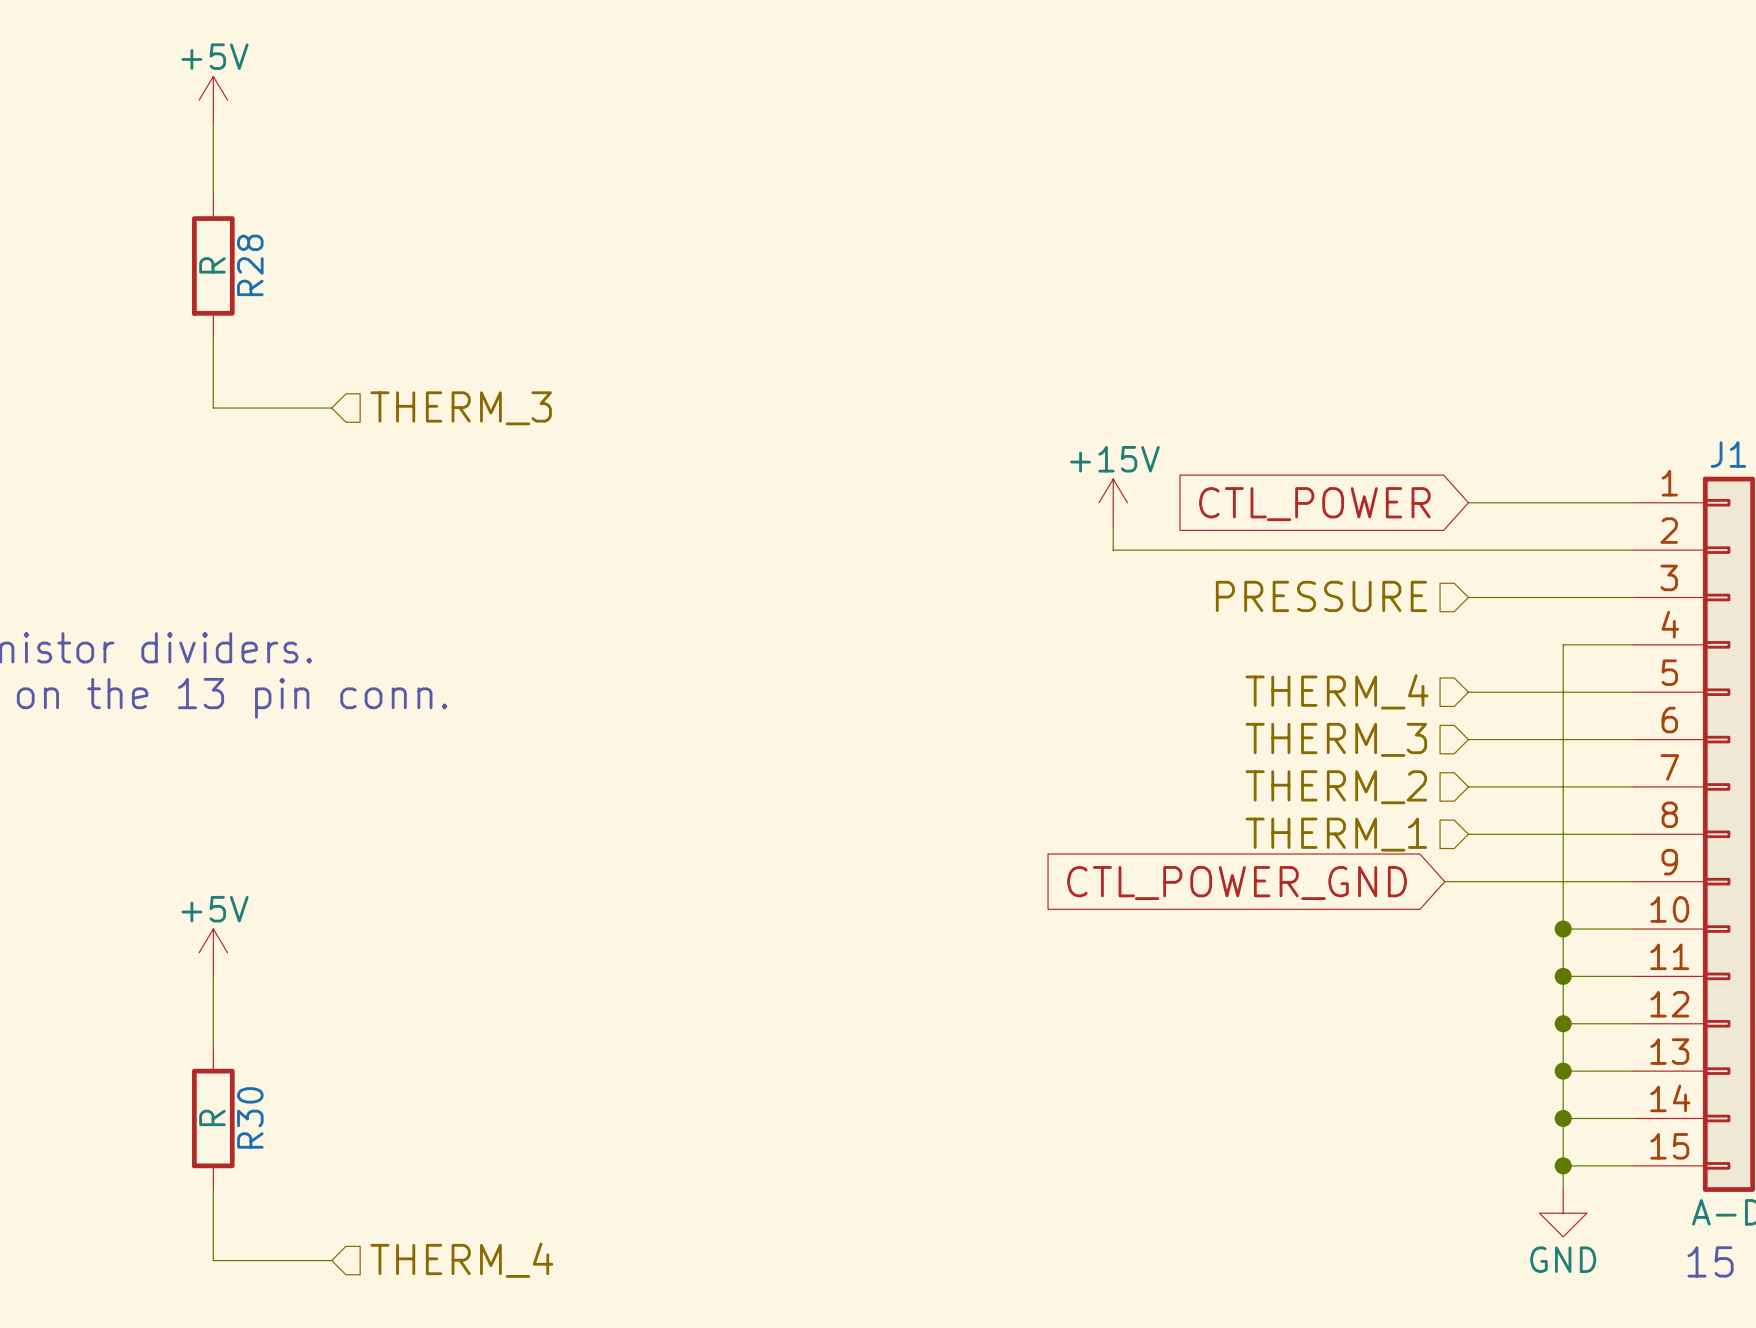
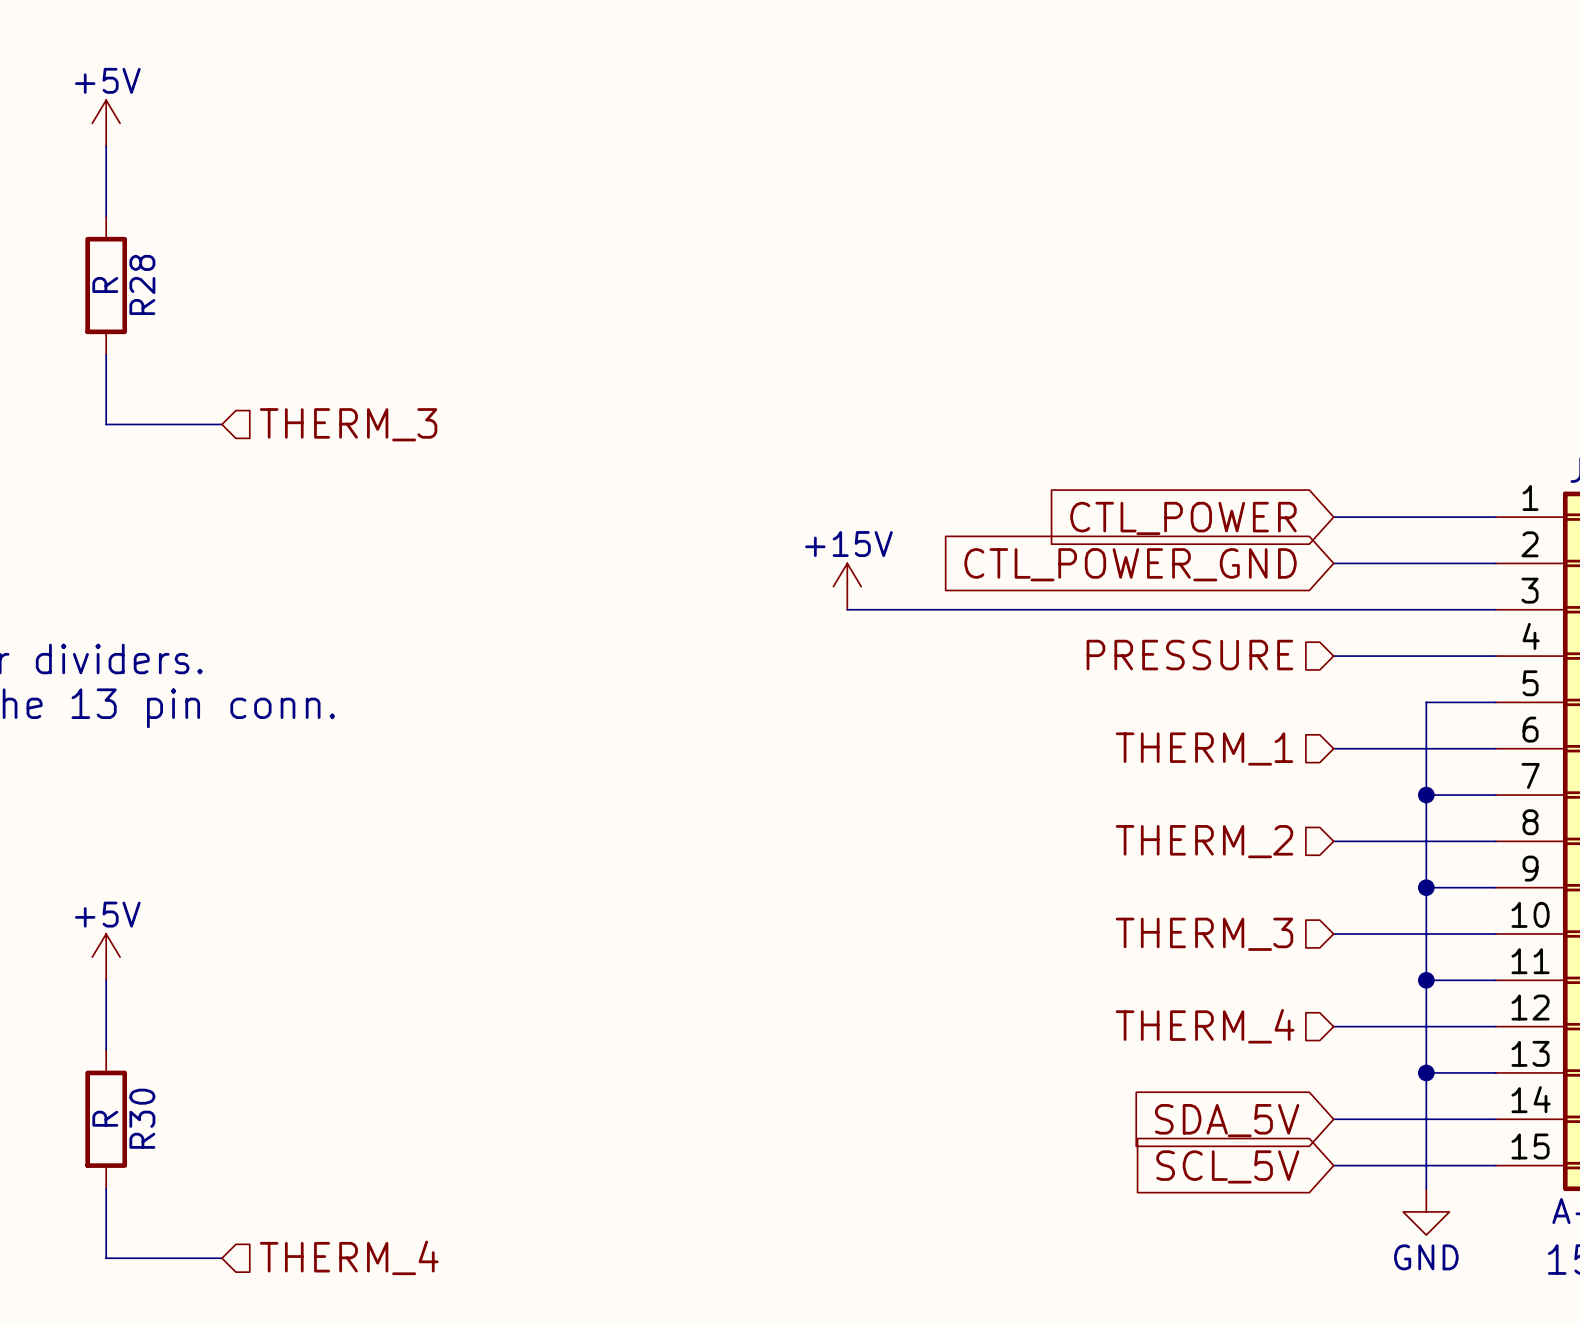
power symbol position: +15V (1113, 502) -> +15V (847, 586)
wire: (1113, 526) (1113, 550) (1468, 550) -> none
hierarchical label position: PRESSURE (1321, 596) -> PRESSURE (1189, 655)
wire: none -> (847, 609) (1333, 609)
wire: (1563, 644) (1563, 692) (1468, 692) -> (1426, 656) (1333, 656)
hierarchical label position: THERM_4 (1337, 691) -> THERM_4 (1205, 1026)
hierarchical label: THERM_3 (1336, 739) -> THERM_1 (1204, 749)
wire: (1468, 786) (1563, 786) -> (1333, 934) (1426, 934)
junction: none -> (1426, 795)
hierarchical label: THERM_2 (1336, 787) -> none
hierarchical label: THERM_1 (1336, 834) -> THERM_2 (1204, 841)
wire: (1444, 881) (1563, 881) -> none
global label position: CTL_POWER_GND (1237, 883) -> CTL_POWER_GND (1130, 564)
hierarchical label: none -> THERM_3 (1204, 934)
junction position: (1563, 929) -> (1426, 887)
wire: none -> (1333, 1026) (1426, 1026)
junction: (1563, 1023) -> none
wire: none -> (1333, 1119) (1426, 1119)
junction: (1563, 1118) -> none
global label: none -> SDA_5V (1227, 1120)
wire: none -> (1333, 1165) (1426, 1165)
junction: (1563, 1165) -> none
global label: none -> SCL_5V (1227, 1166)

